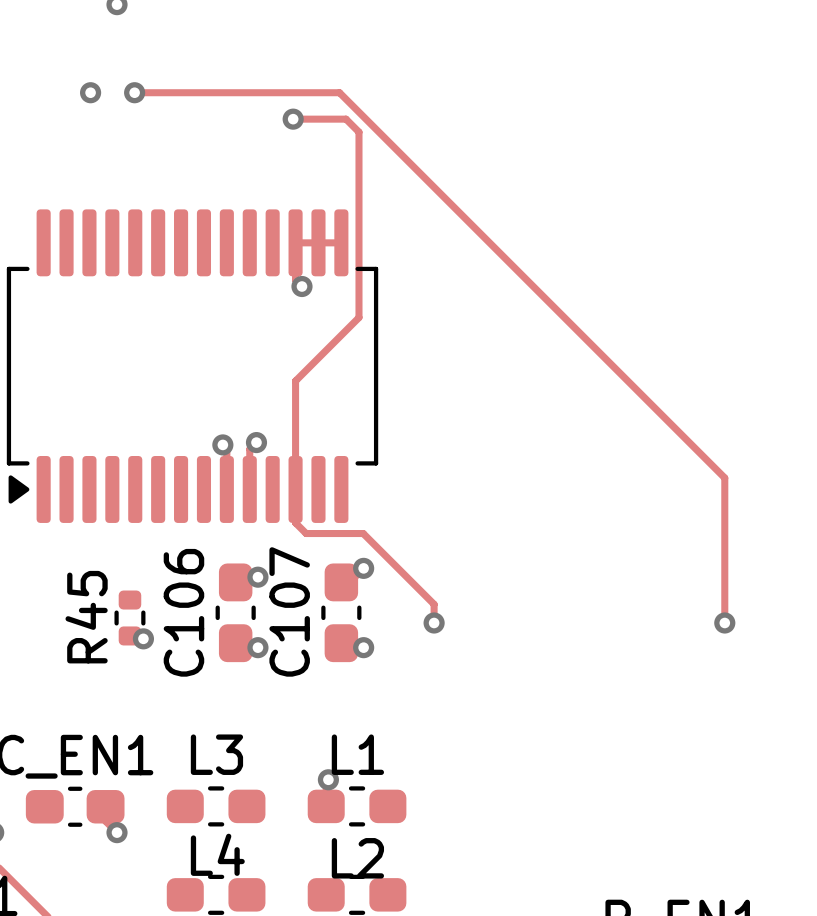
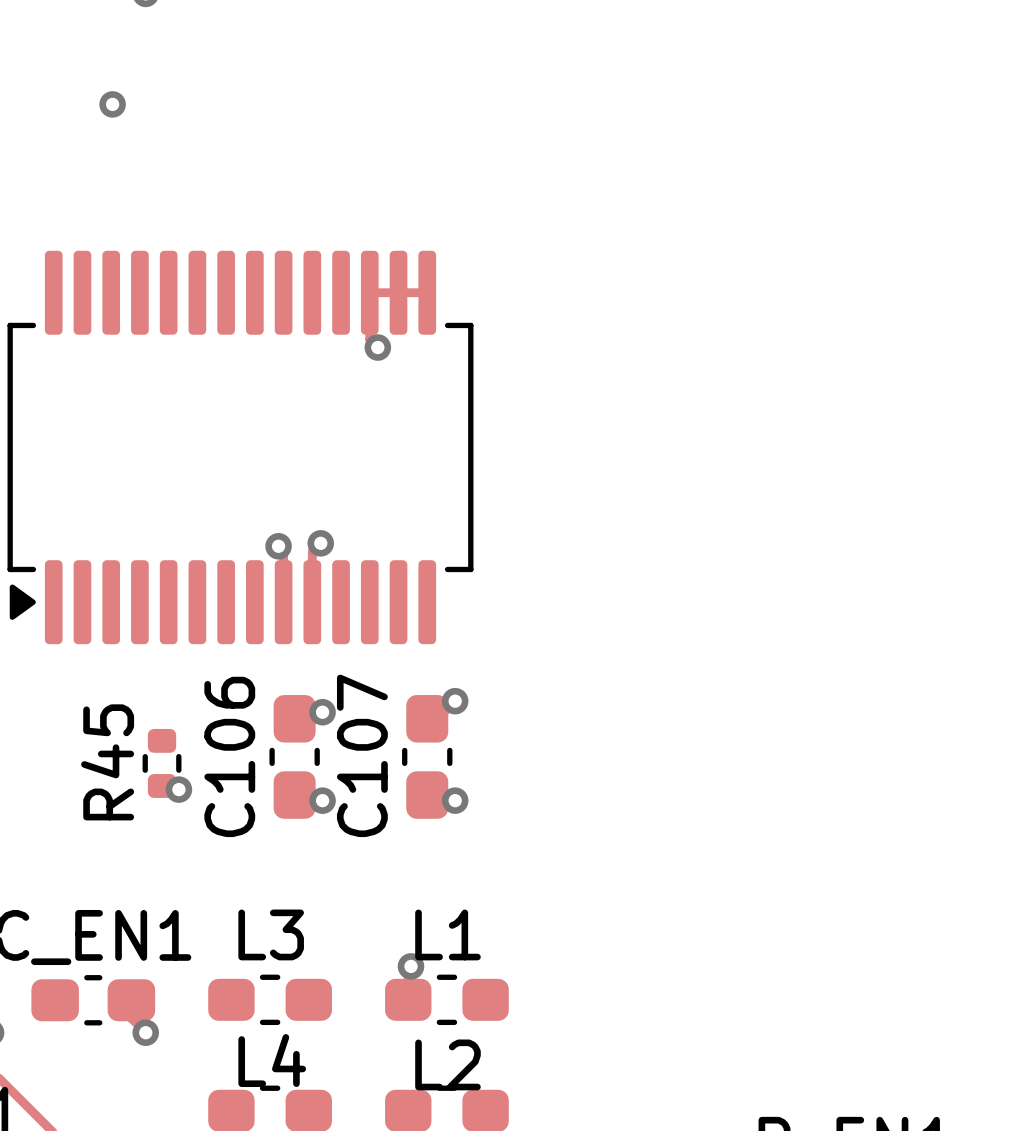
track: (134, 92) (339, 92) (724, 477) (724, 622) -> none
via: (134, 92) -> none
track: (293, 119) (346, 119) (358, 132) (358, 317) (295, 381) (295, 522) (306, 533) (363, 533) (434, 604) (434, 622) -> none
via: (293, 119) -> none
via: (434, 622) -> none
via: (724, 622) -> none

